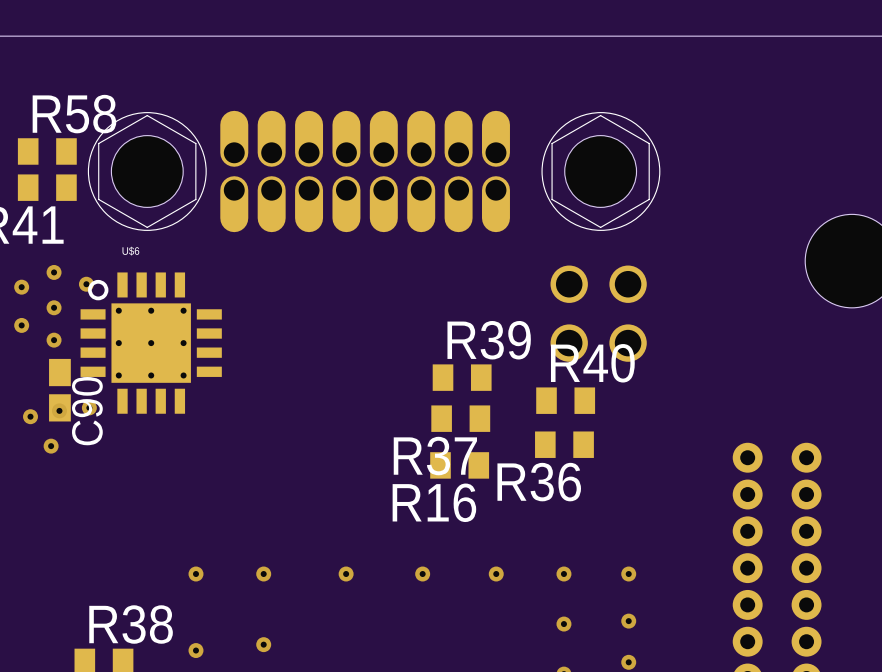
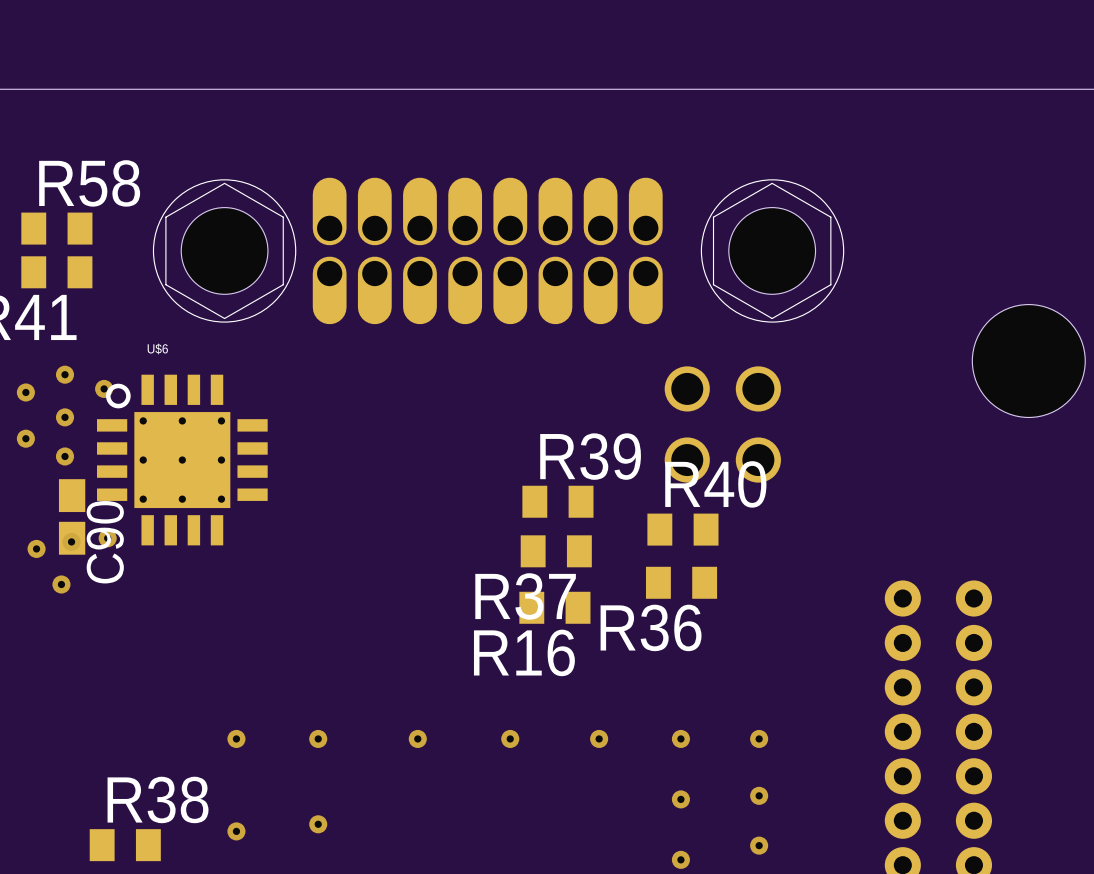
part position: (374, 171) -> (498, 250)

